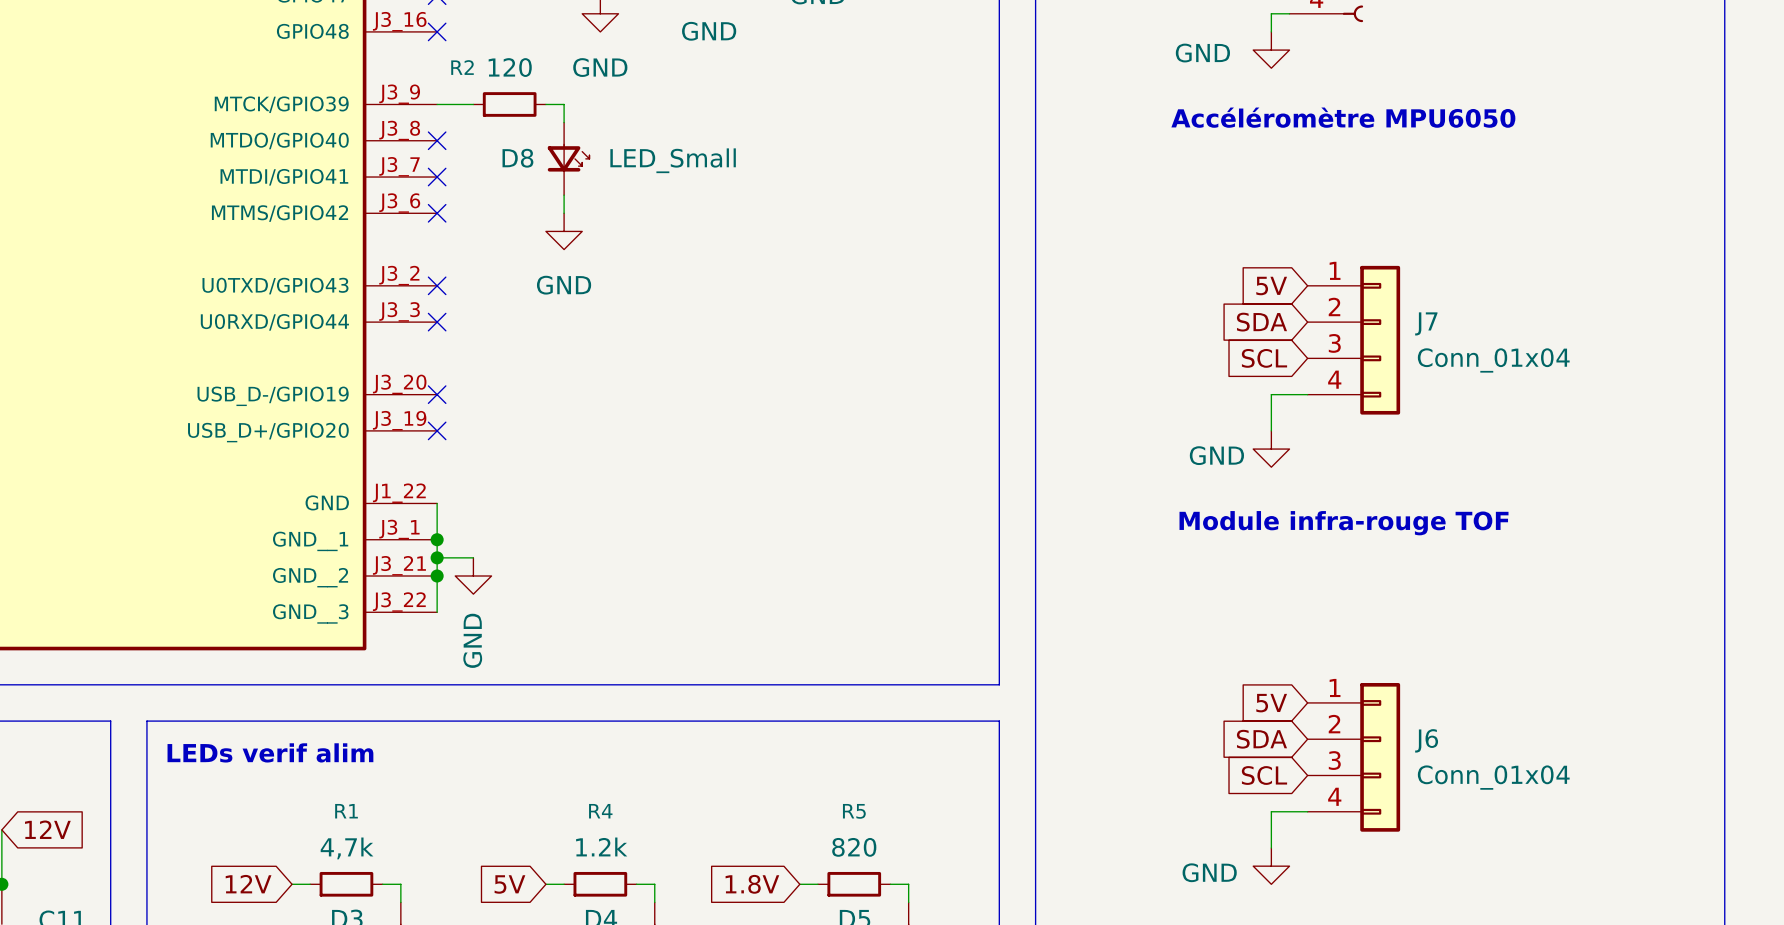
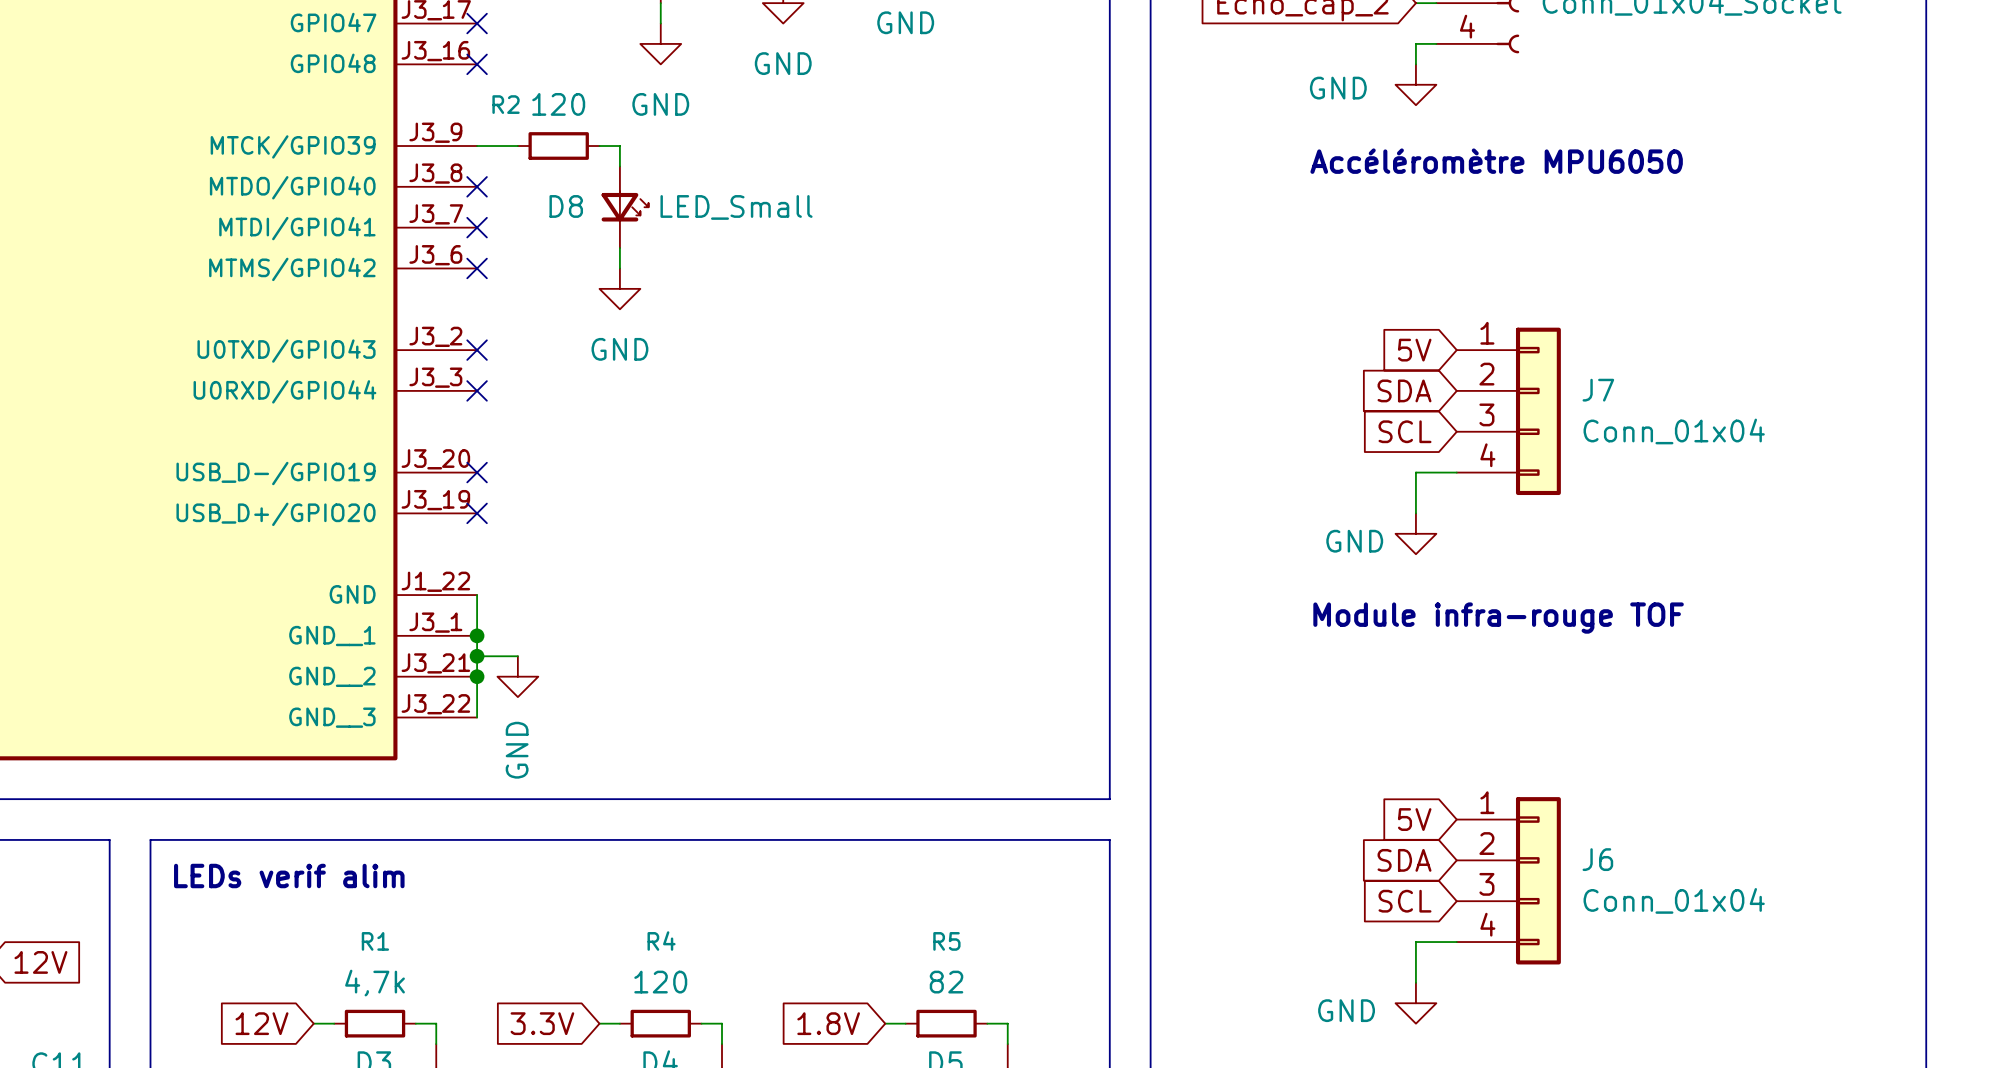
R4 value: 1.2k (601, 846) -> 120 (660, 982)
R5 value: 820 (854, 847) -> 82 (946, 982)
global label: 5V (509, 884) -> 3.3V (542, 1023)

